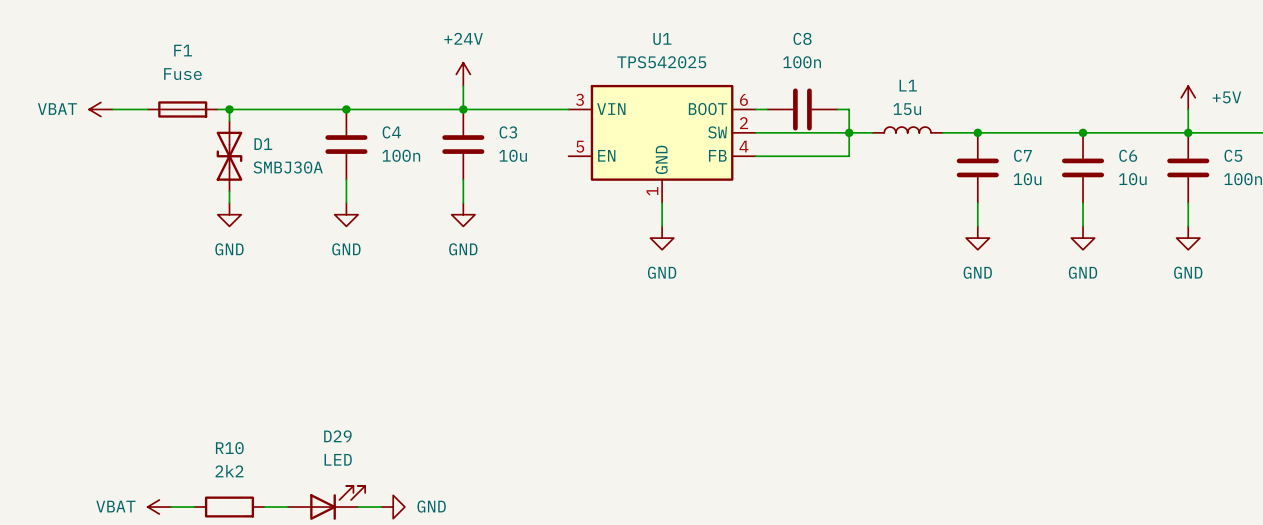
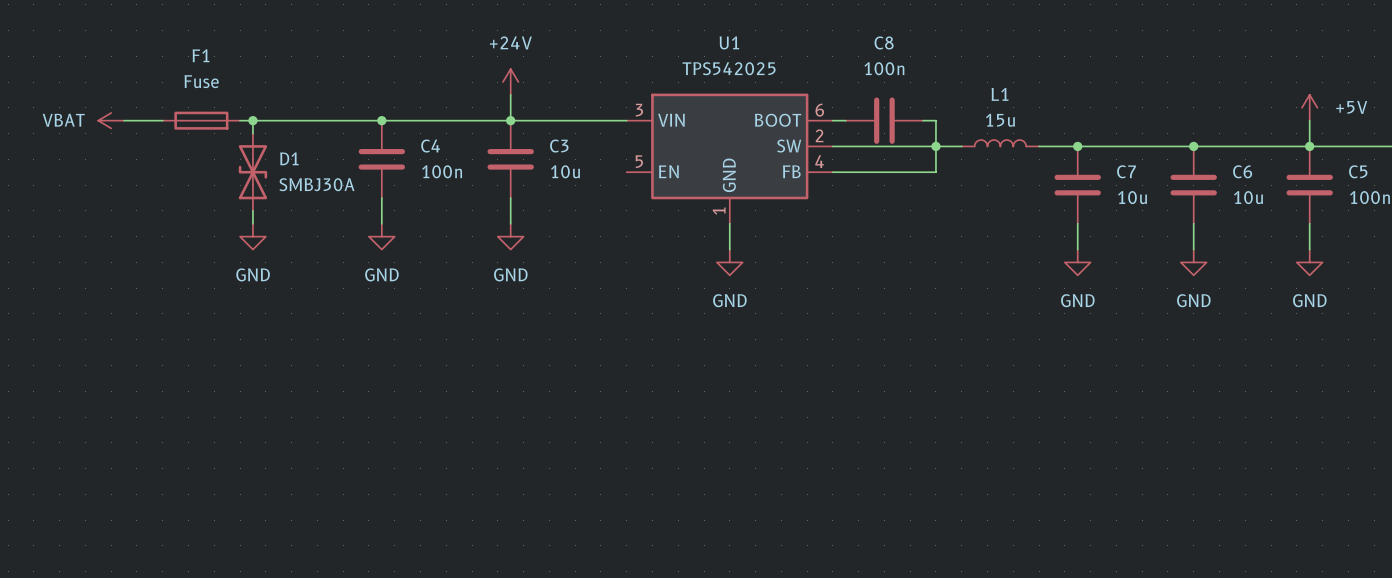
D29: LED (326, 502) -> none
power symbol: VBAT (159, 507) -> none
wire: (171, 507) (194, 507) -> none
R10: 2k2 (229, 507) -> none
wire: (264, 507) (287, 507) -> none
wire: (358, 507) (381, 507) -> none
power symbol: GND (393, 507) -> none

